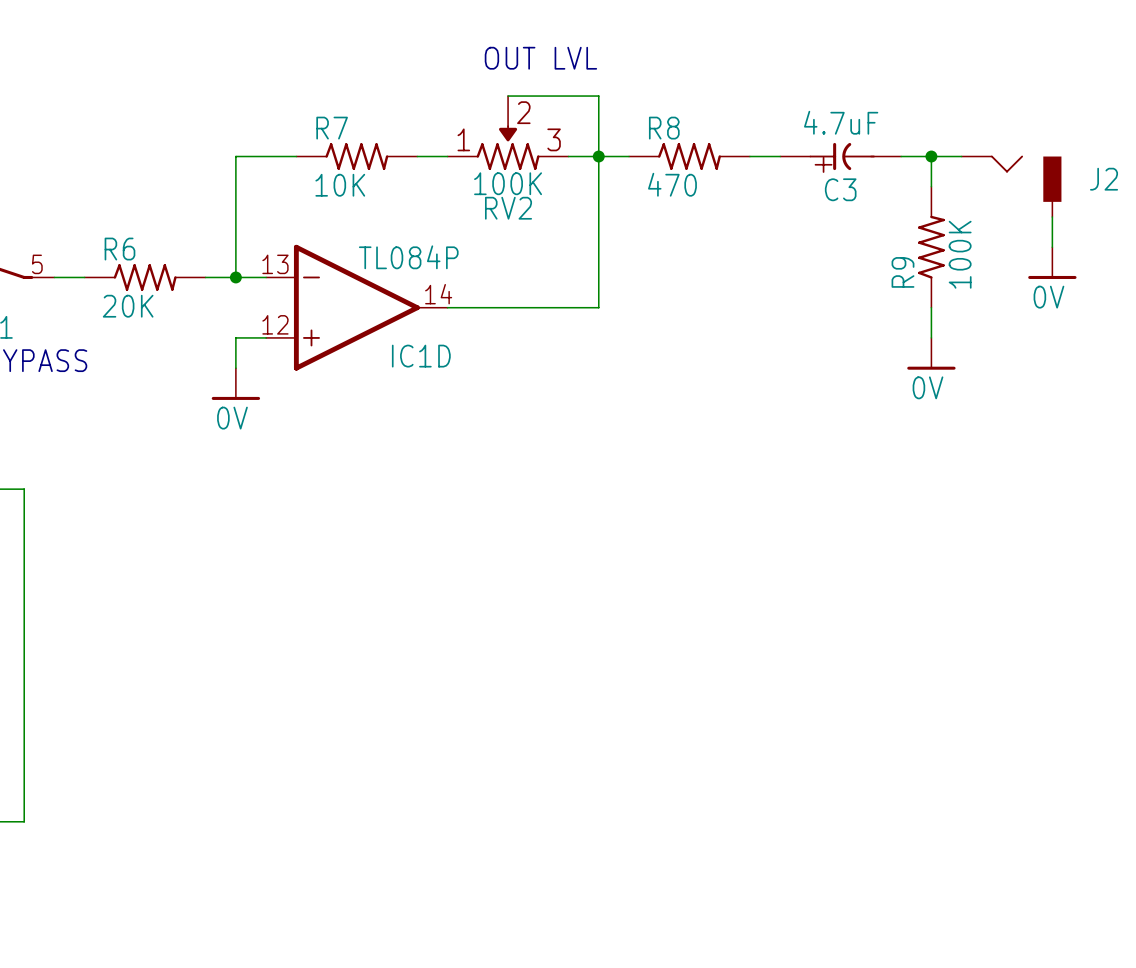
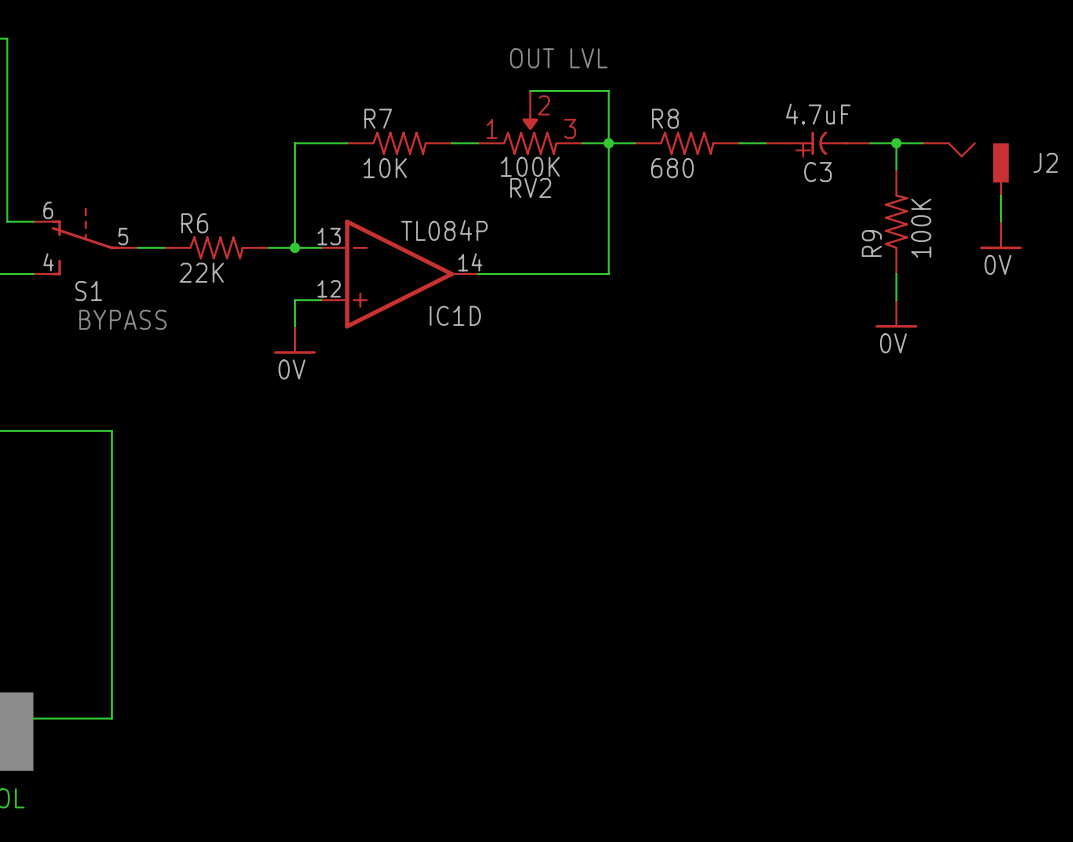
R8 value: 470 (672, 184) -> 680 (672, 168)
R6 value: 20K (128, 306) -> 22K (201, 272)

